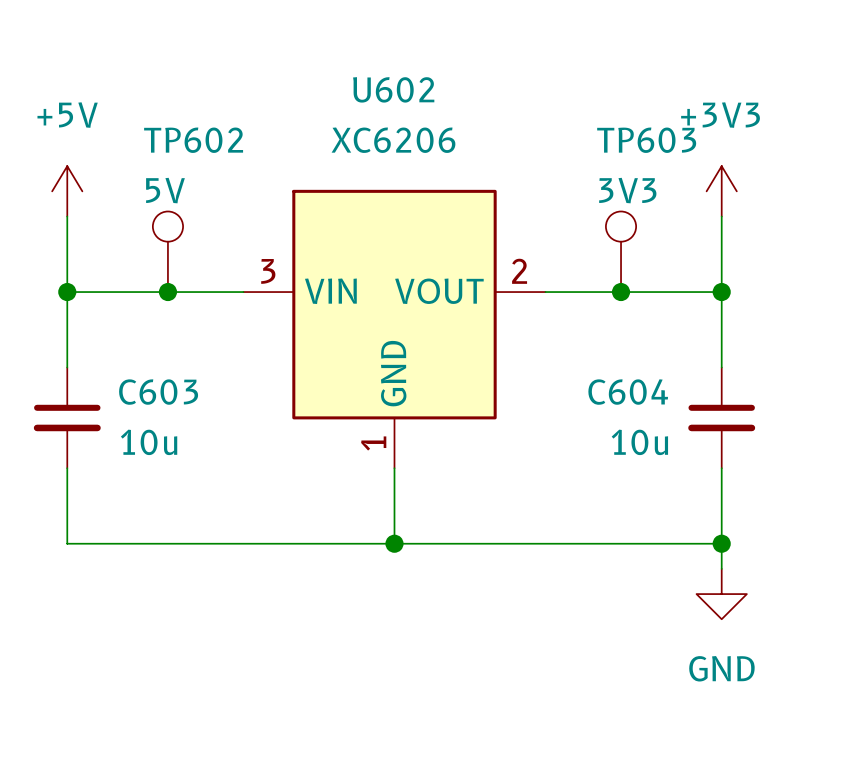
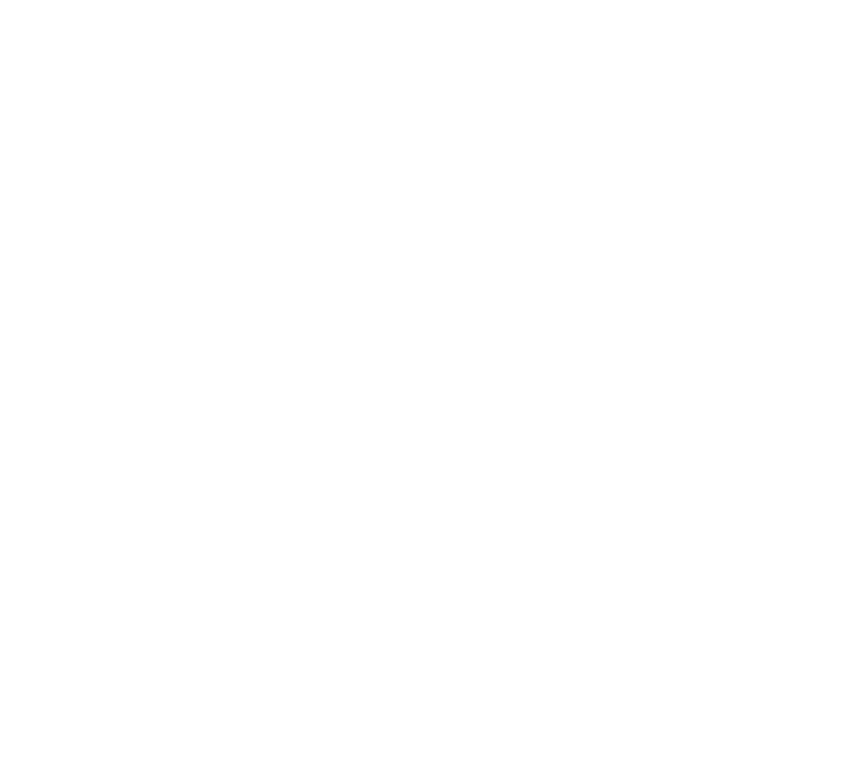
power symbol: +5V (67, 191) -> none
power symbol: +3V3 (721, 191) -> none
wire: (67, 216) (67, 367) -> none
wire: (721, 216) (721, 367) -> none
TP602: 5V (167, 251) -> none
TP603: 3V3 (621, 251) -> none
wire: (67, 292) (243, 292) -> none
junction: (67, 292) -> none
junction: (167, 292) -> none
wire: (545, 292) (721, 292) -> none
junction: (621, 292) -> none
junction: (721, 292) -> none
U602: XC6206 (394, 329) -> none
C603: 10u (67, 417) -> none
C604: 10u (721, 417) -> none
wire: (67, 468) (67, 543) (721, 543) -> none
wire: (394, 468) (394, 543) -> none
wire: (721, 468) (721, 568) -> none
junction: (394, 543) -> none
junction: (721, 543) -> none
power symbol: GND (721, 594) -> none

